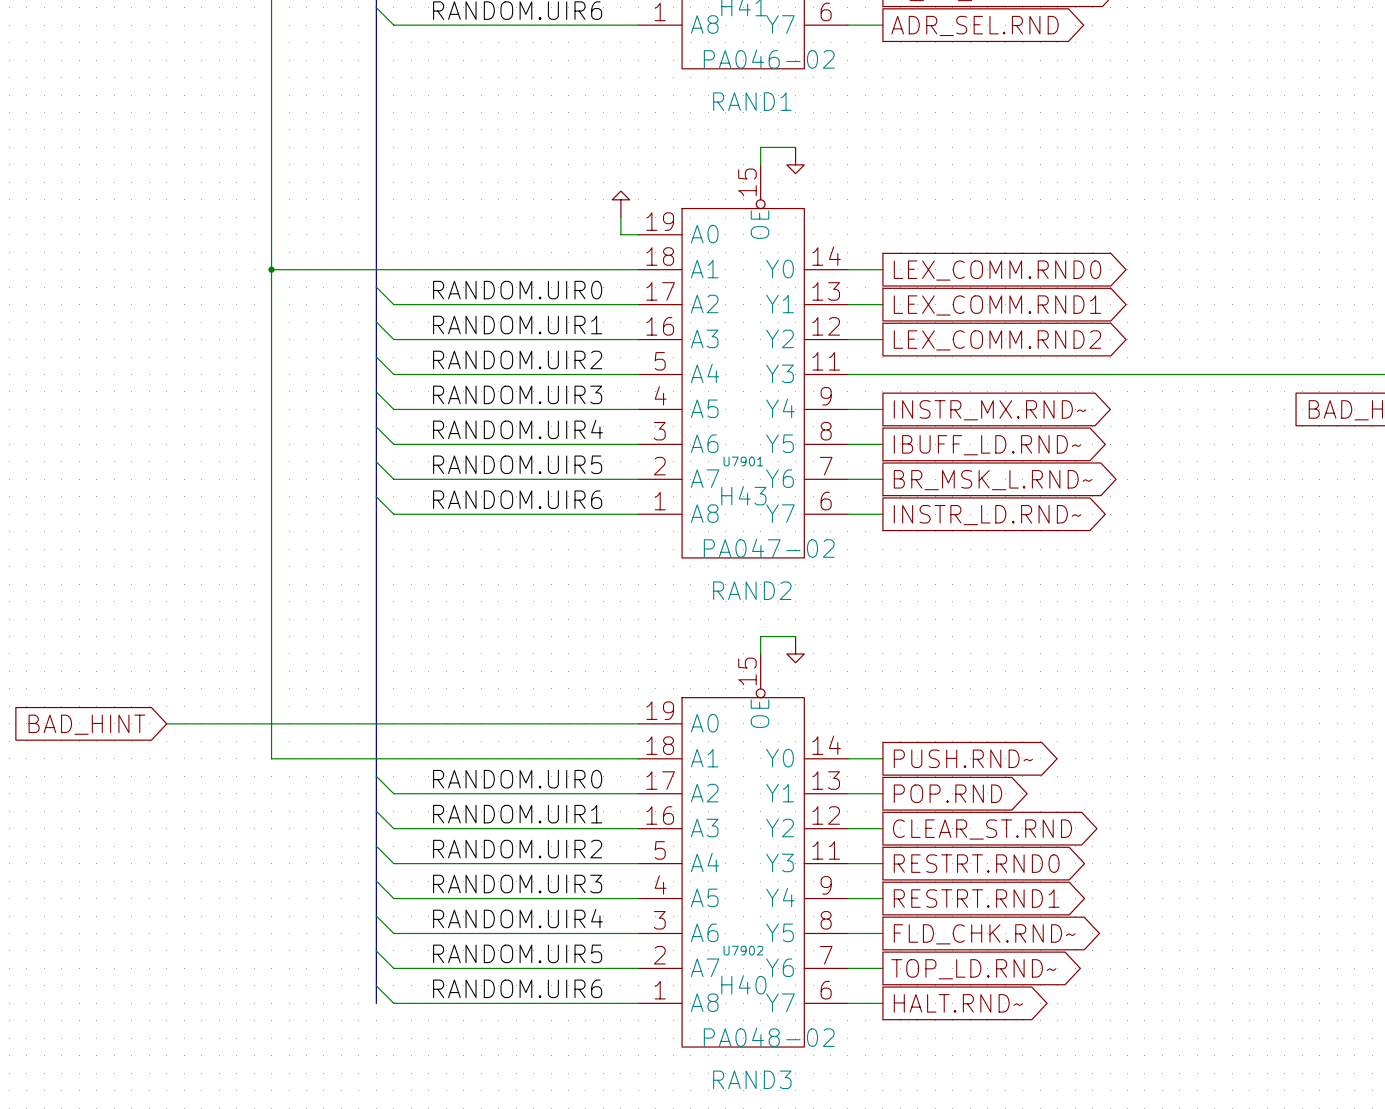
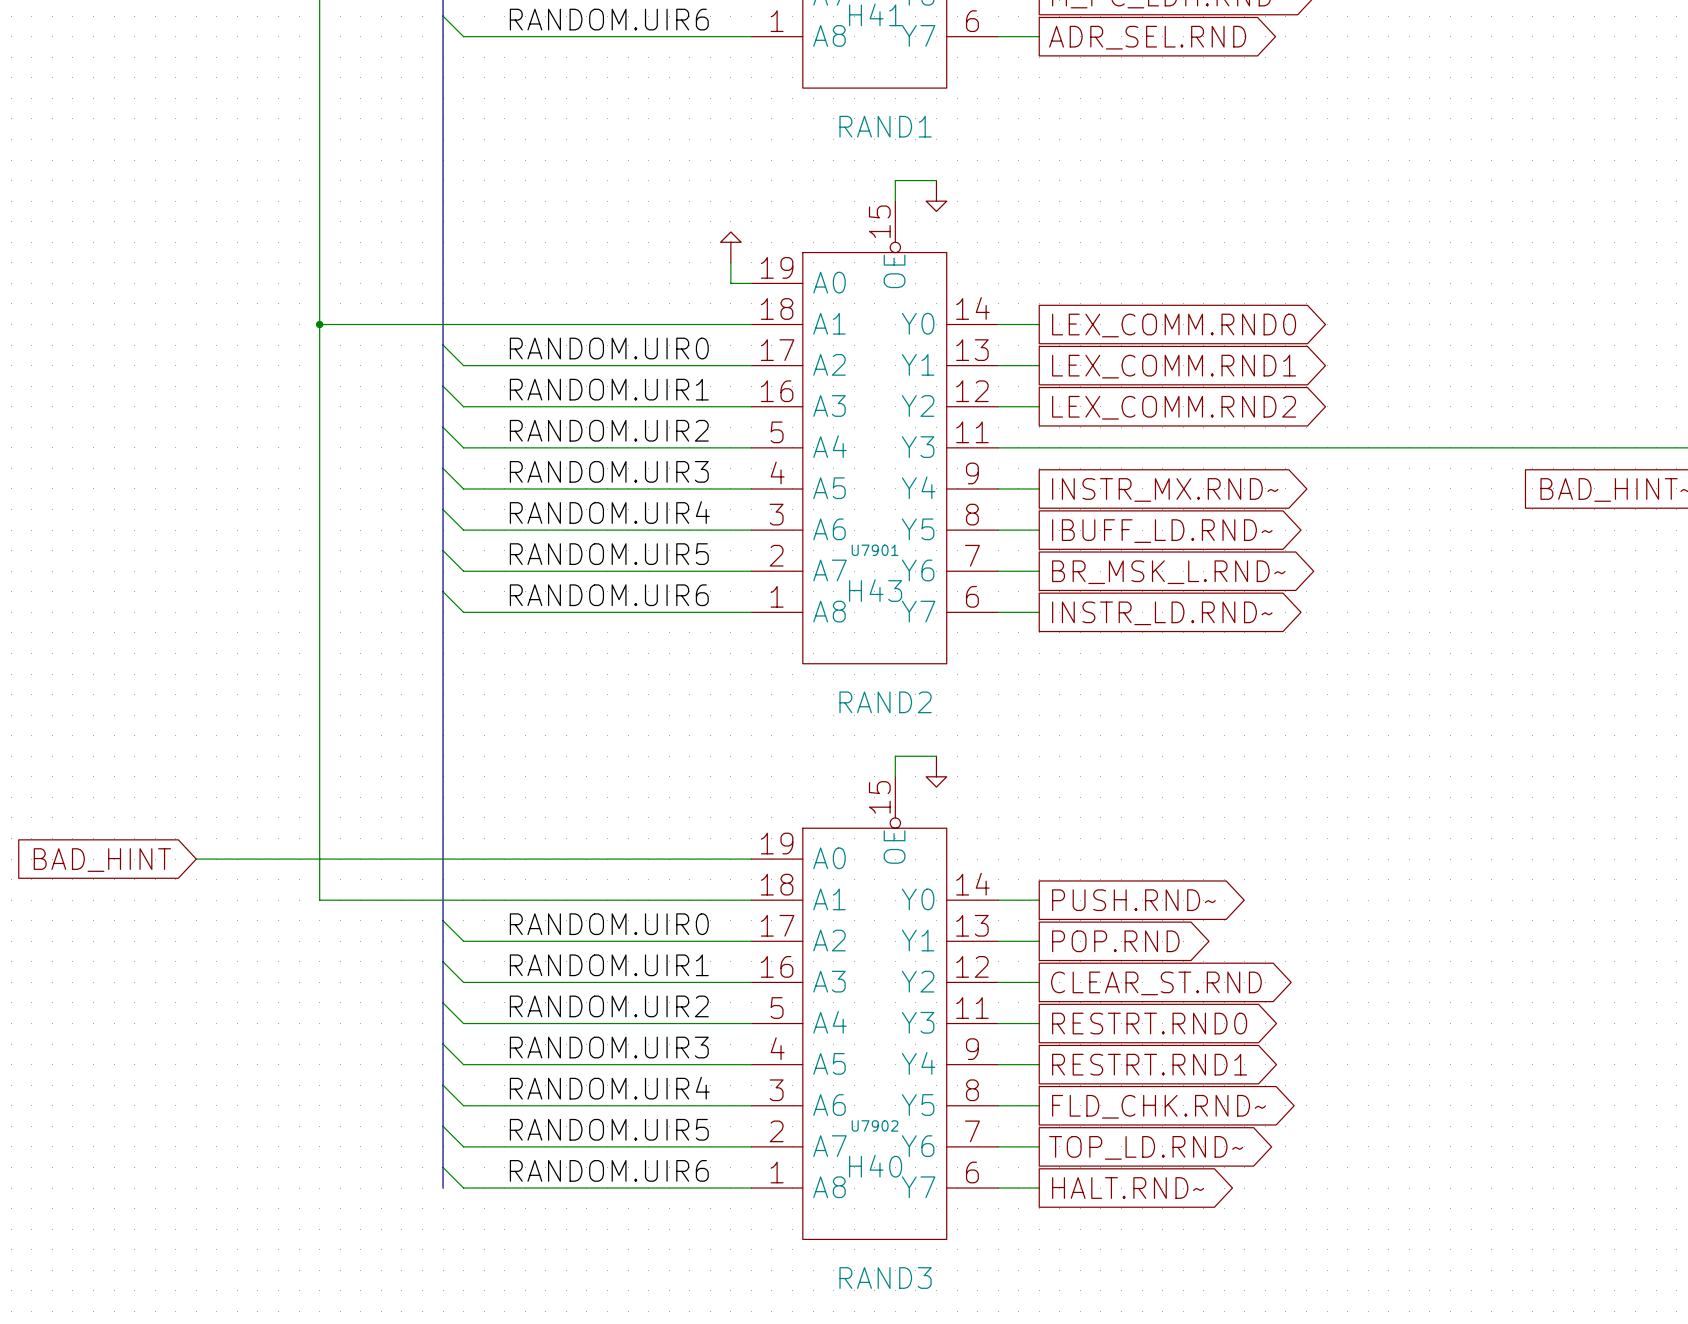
part value: PA046-02 (769, 59) -> none
U7901 value: PA047-02 (769, 548) -> none
U7902 value: PA048-02 (769, 1037) -> none

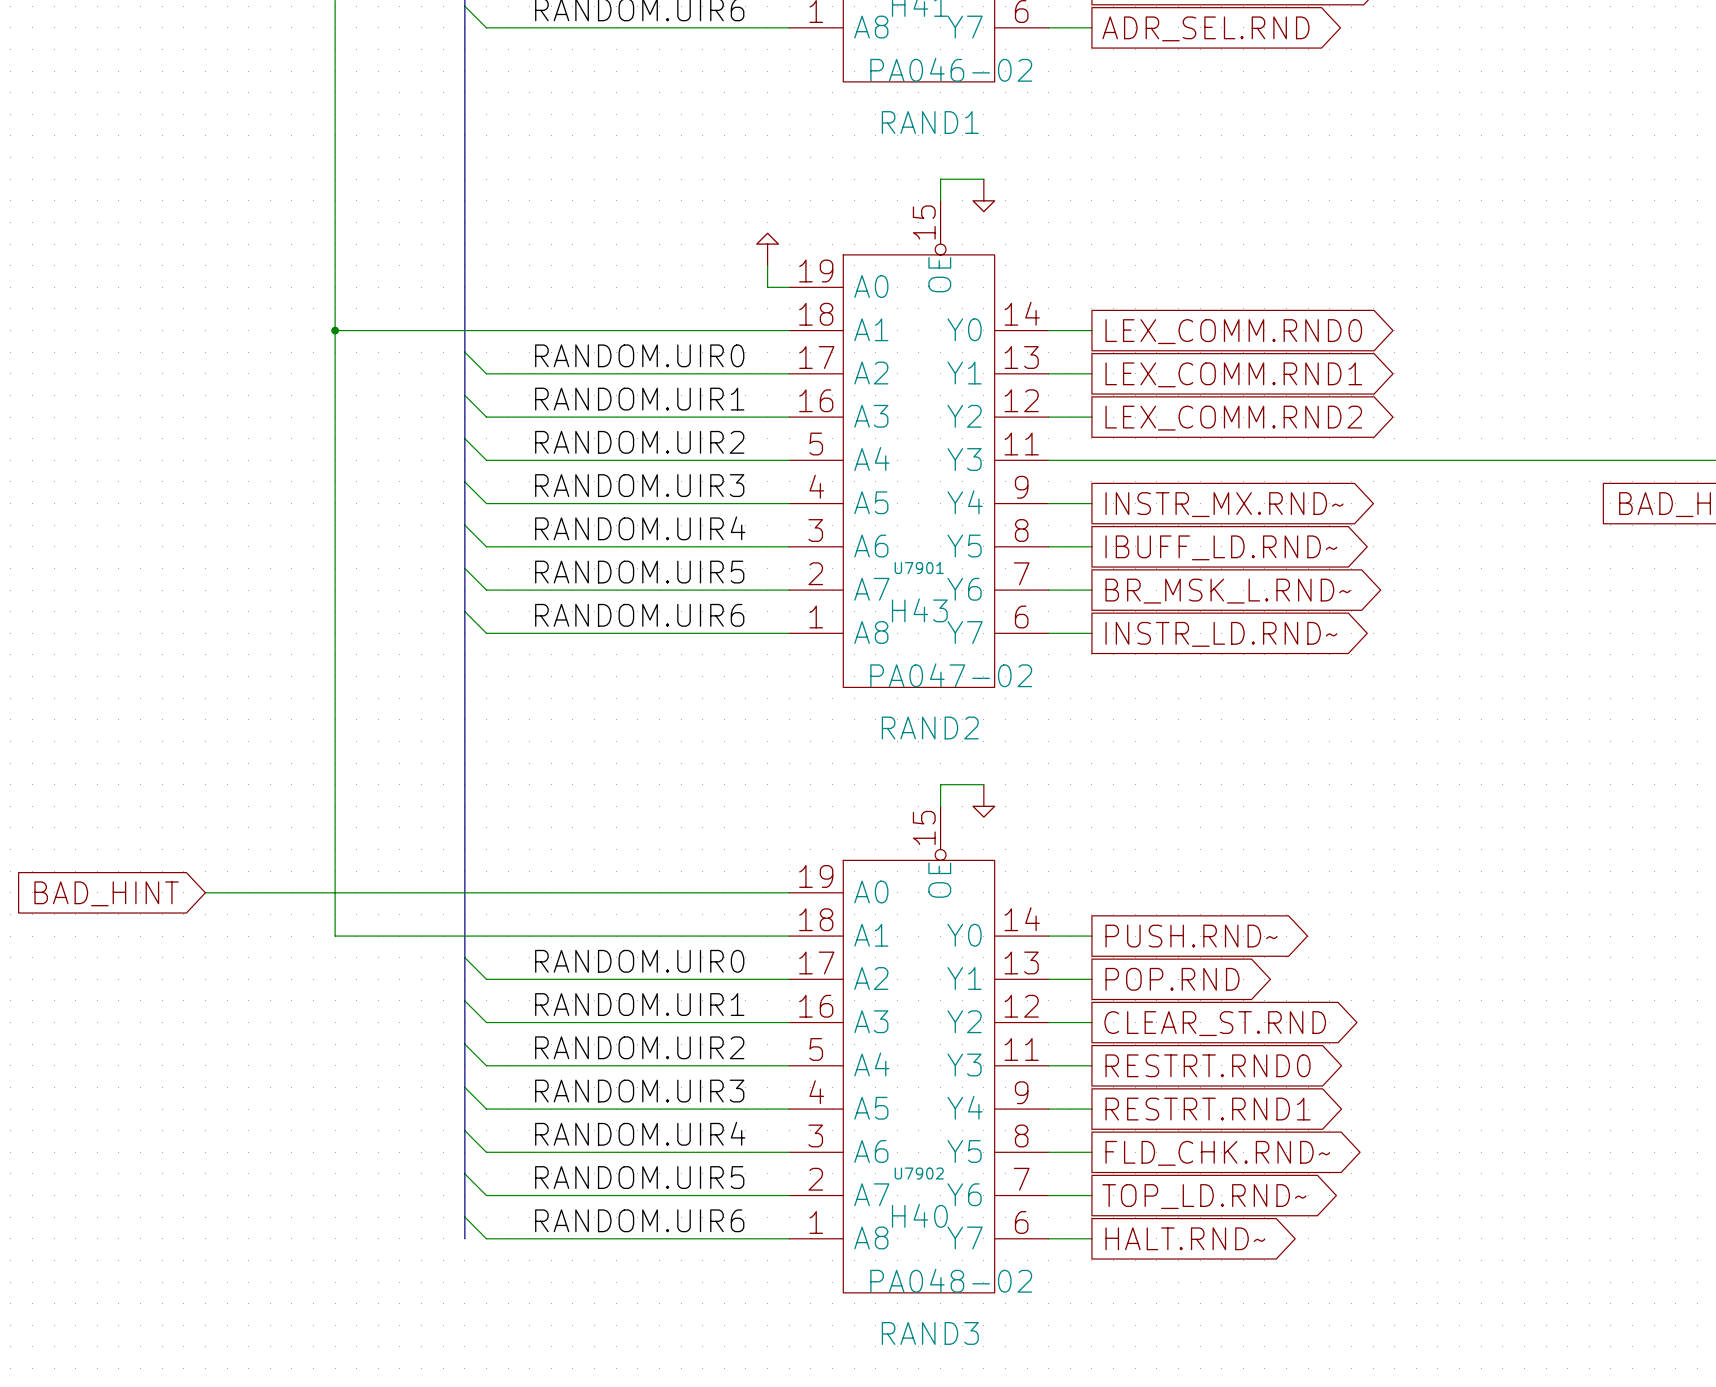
part value: none -> PA046-02 (951, 69)
U7901 value: none -> PA047-02 (951, 675)
U7902 value: none -> PA048-02 (951, 1280)

